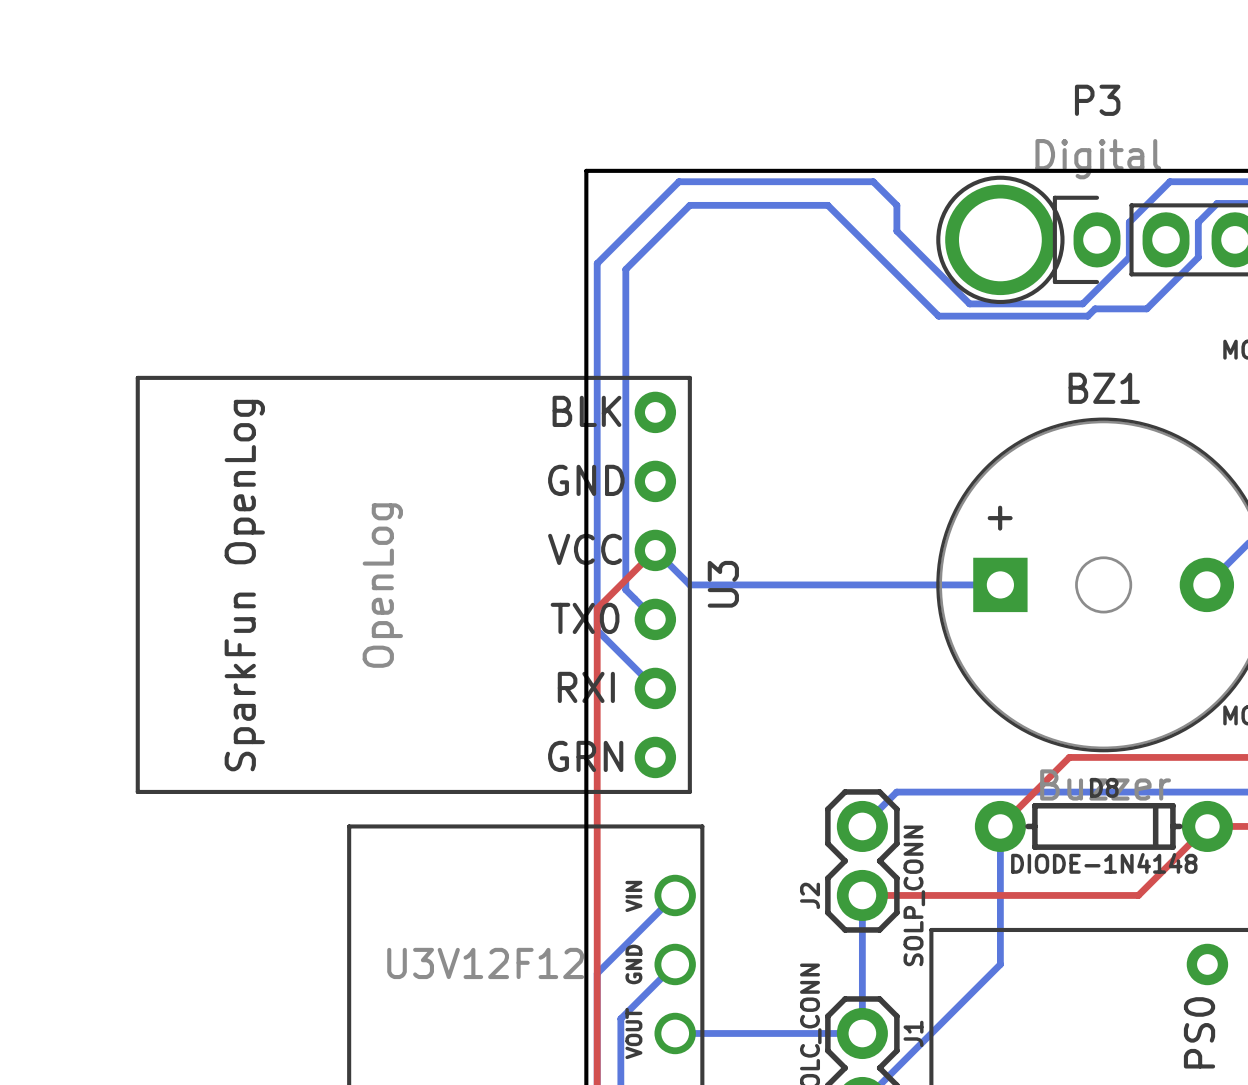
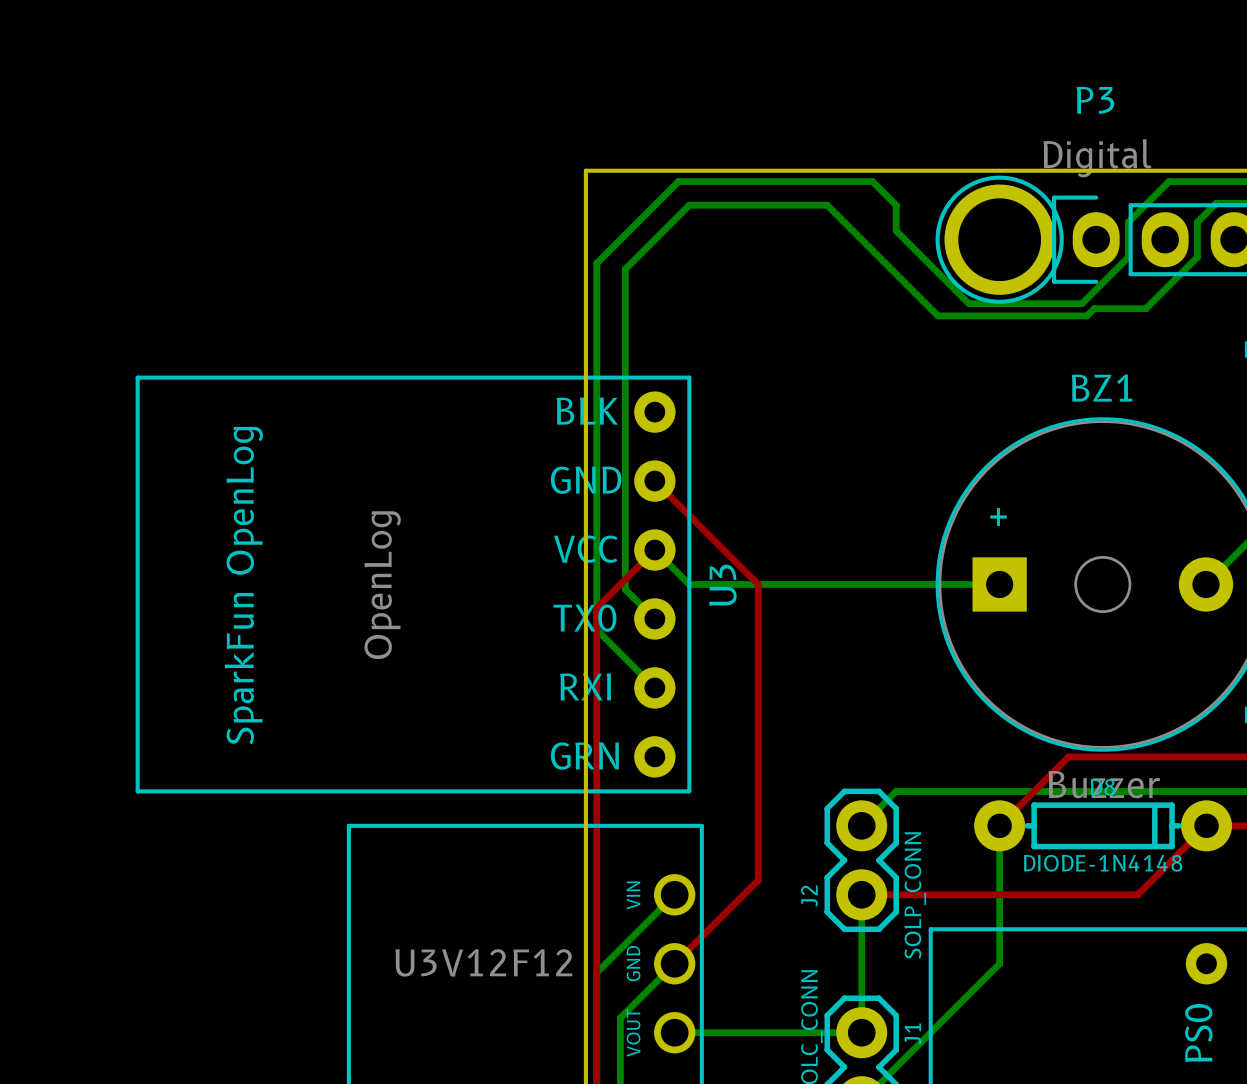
top track: none -> (654, 481) (758, 584) (758, 880) (674, 963)

